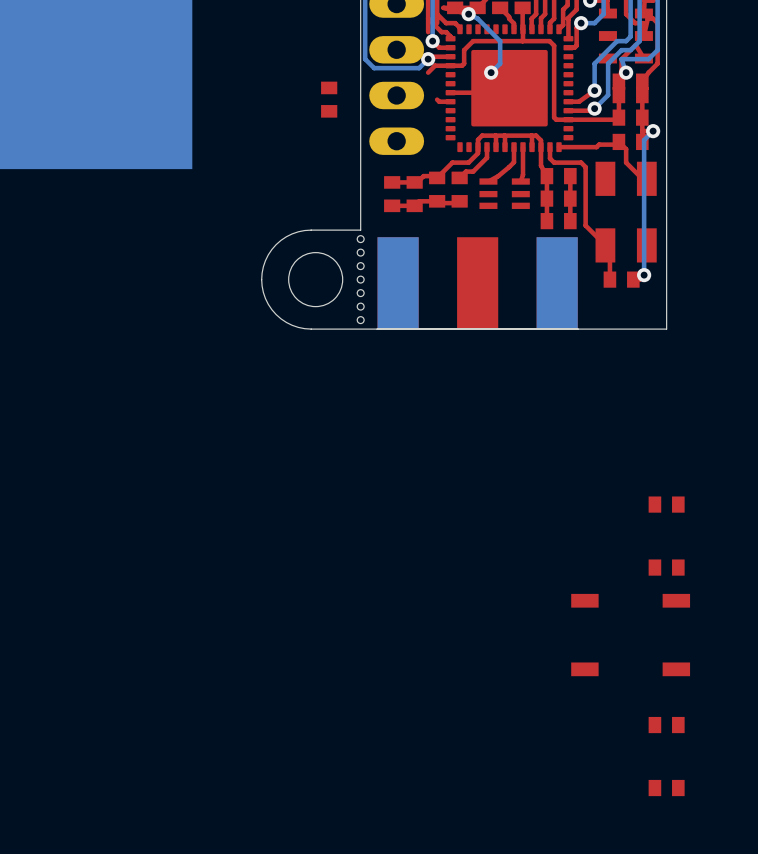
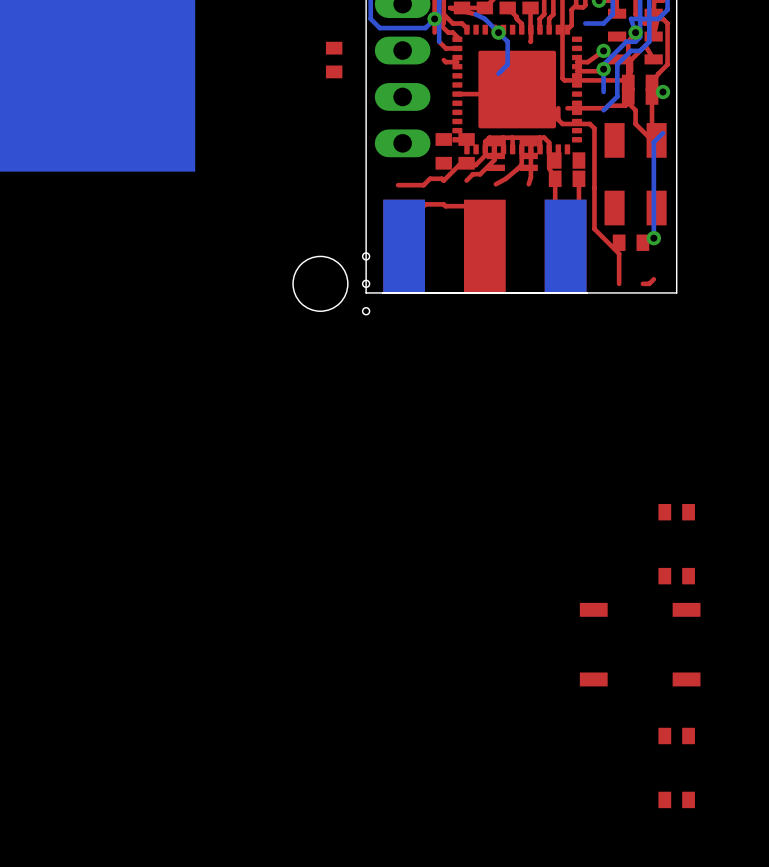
top track: (576, 5) (576, 9) (567, 18) (568, 38) -> (585, 5) (583, 7) (577, 7)
bottom track: (657, 9) (657, 50) (648, 59) (621, 59) (626, 72) -> (667, 9) (658, 18) (631, 18) (635, 32)
via: (468, 14) -> none
bottom track: (365, 18) (365, 59) (374, 68) (419, 68) (428, 59) -> (370, 18) (379, 28) (425, 28) (434, 18)
via: none -> (434, 18)
top track: (554, 18) (550, 22) (550, 29) -> (562, 18) (562, 46)
top track: (581, 23) (576, 27) (576, 45) (568, 47) -> none
via: (581, 23) -> none
via: none -> (498, 32)
via: none -> (635, 32)
via: (432, 41) -> none
top track: (554, 45) (549, 41) (473, 41) (464, 50) (464, 63) (462, 65) (435, 65) (428, 72) -> none
via: none -> (603, 50)
top track: (450, 56) (430, 56) (428, 59) -> none
via: (428, 59) -> none
via: none -> (603, 69)
via: (491, 72) -> none
top track: (626, 72) (618, 81) (618, 117) (616, 119) (556, 119) (554, 117) (554, 77) -> (635, 32) (628, 41) (628, 78) (626, 80) (564, 80) (562, 78)
via: (626, 72) -> none
top track: (594, 90) (579, 101) (568, 101) -> (603, 50) (587, 62) (577, 62)
via: (594, 90) -> none
via: none -> (662, 92)
part position: (329, 99) -> (334, 60)
top track: (437, 99) (439, 101) (450, 101) -> (443, 60) (445, 62) (457, 62)
top track: (594, 108) (592, 110) (568, 110) -> (603, 69) (601, 71) (577, 71)
via: (594, 108) -> none
part: (630, 117) -> none
via: (653, 131) -> none
part: (630, 141) -> none
top track: (550, 147) (550, 158) (554, 162) (581, 162) (585, 167) -> (558, 108) (558, 119) (562, 123) (589, 123) (594, 128) (594, 169)
top track: (559, 147) (596, 147) (599, 144) (616, 144) (618, 141) (626, 149) (626, 162) (642, 178) (646, 178) -> (567, 108) (605, 108) (608, 105) (625, 105) (628, 102) (635, 110) (635, 123) (652, 140) (656, 140)
part: none -> (443, 151)
part: none -> (466, 151)
part: none -> (567, 160)
part: (437, 189) -> none
part: (459, 189) -> none
part position: (504, 193) -> (512, 155)
part: (392, 194) -> none
part: (414, 194) -> none
part: (558, 198) -> none
part position: (626, 212) -> (635, 174)
part: (558, 221) -> none
board edge: (360, 230) (304, 230) (286, 236) (276, 244) (265, 260) (261, 279) (265, 298) (276, 314) (292, 325) (311, 329) (666, 329) (666, 288) -> (366, 233) (366, 292) (676, 292)
bottom track: (644, 234) (644, 275) -> none
hole: (360, 239) -> none
part: none -> (631, 242)
hole: (360, 266) -> none
via position: (644, 275) -> (653, 238)
part: (621, 279) -> none
part position: (477, 283) -> (484, 246)
hole: (360, 293) -> none
hole: (360, 320) -> none

